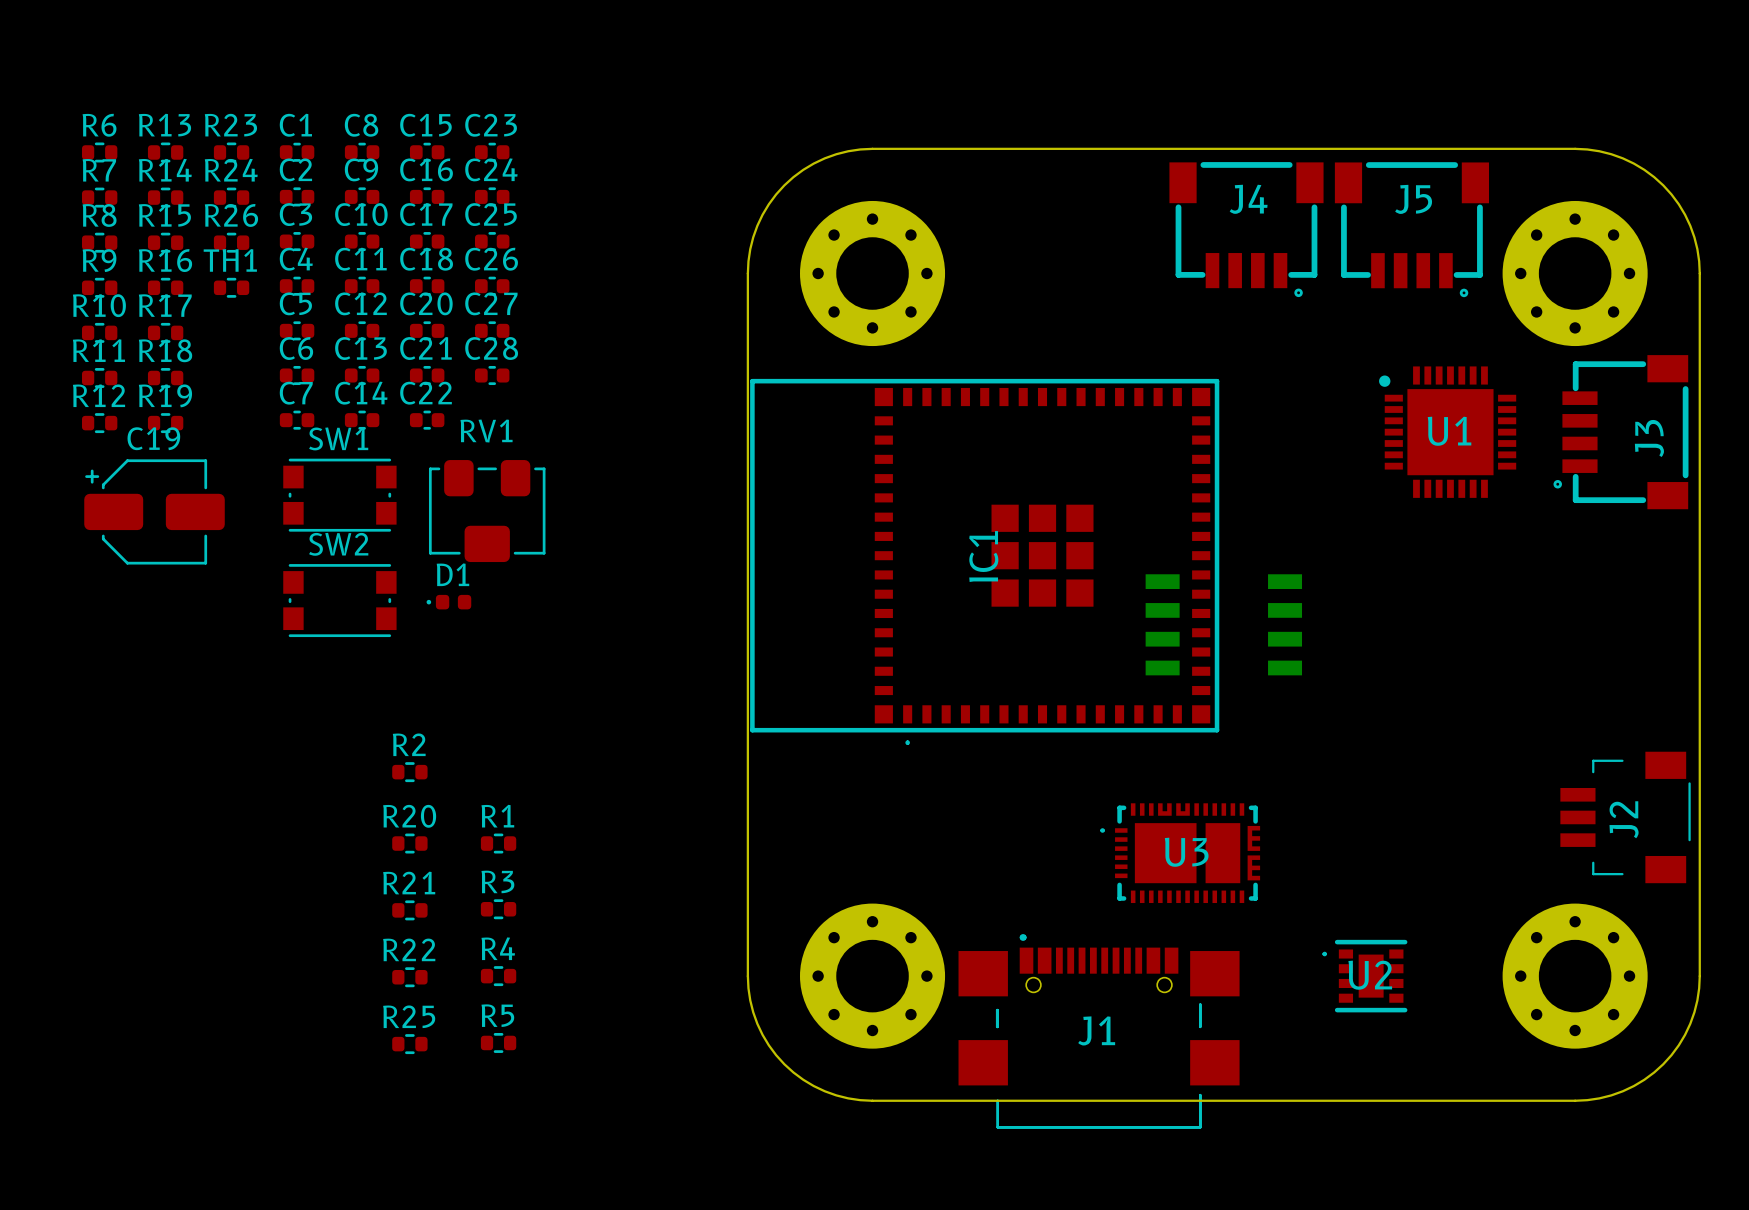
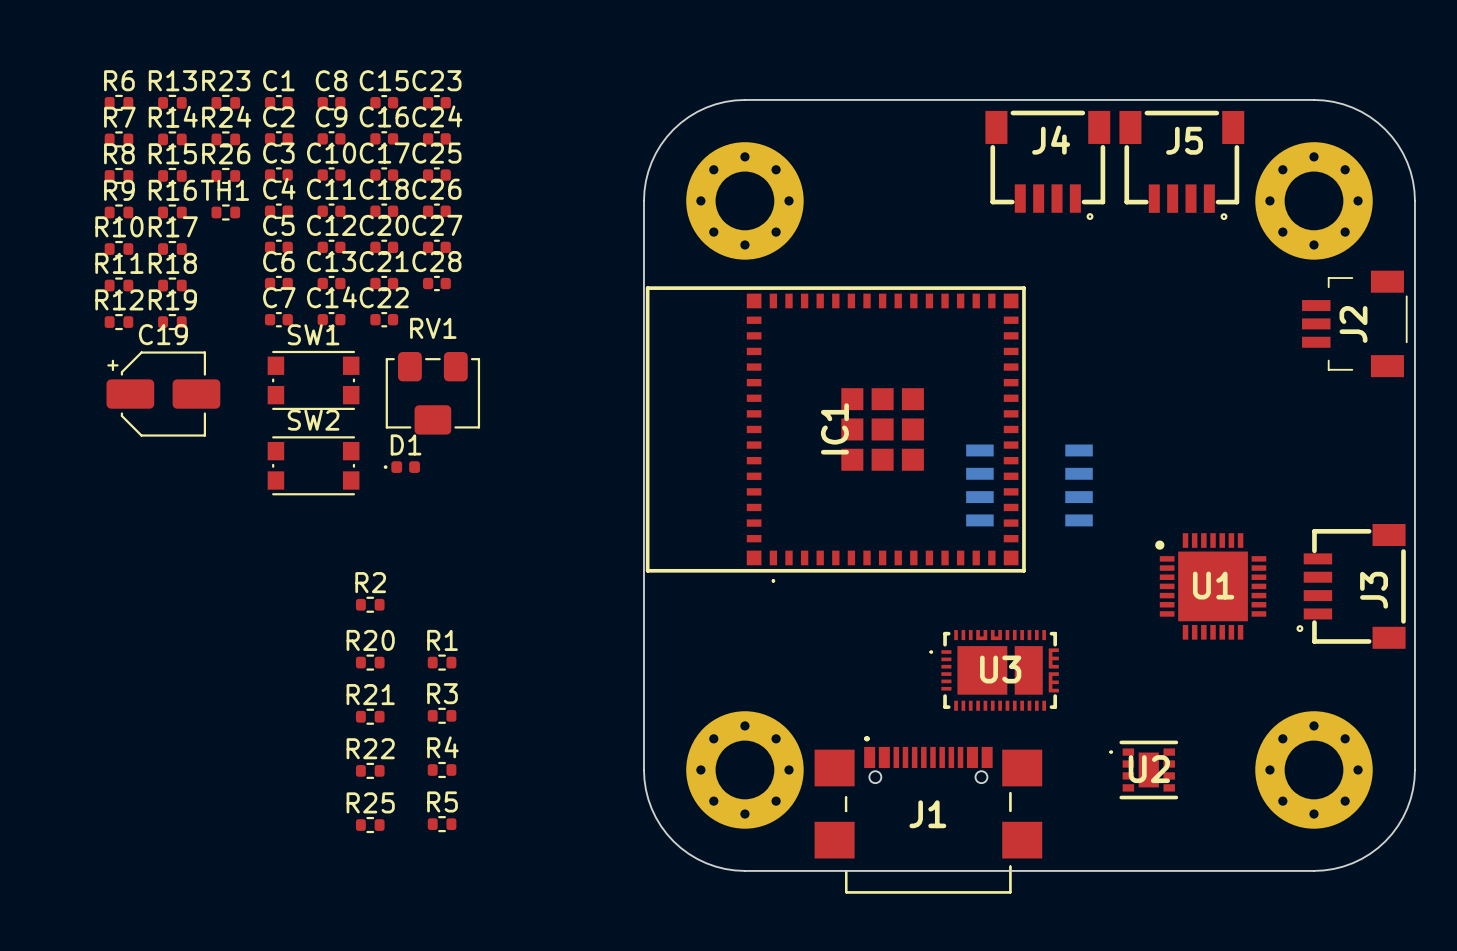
U1 position: (1447, 432) -> (1210, 586)
J3 position: (1620, 432) -> (1351, 586)
J2 position: (1625, 817) -> (1354, 323)

